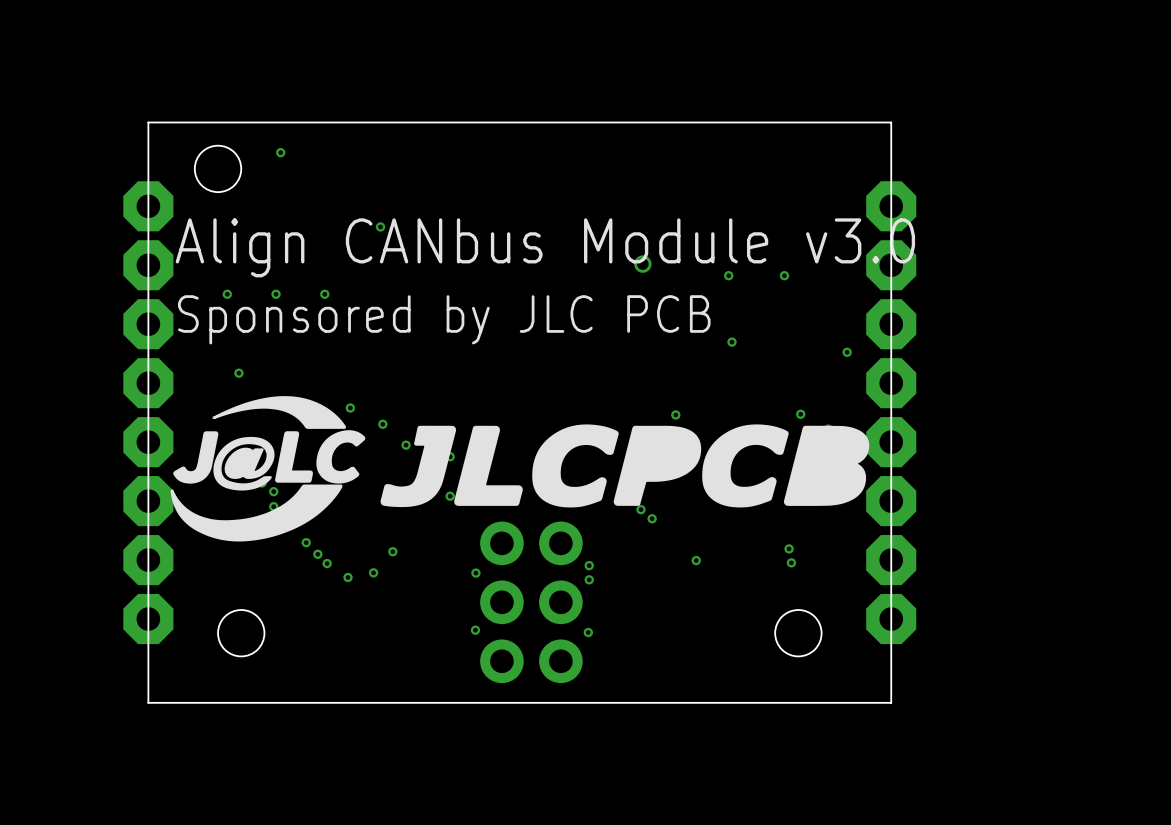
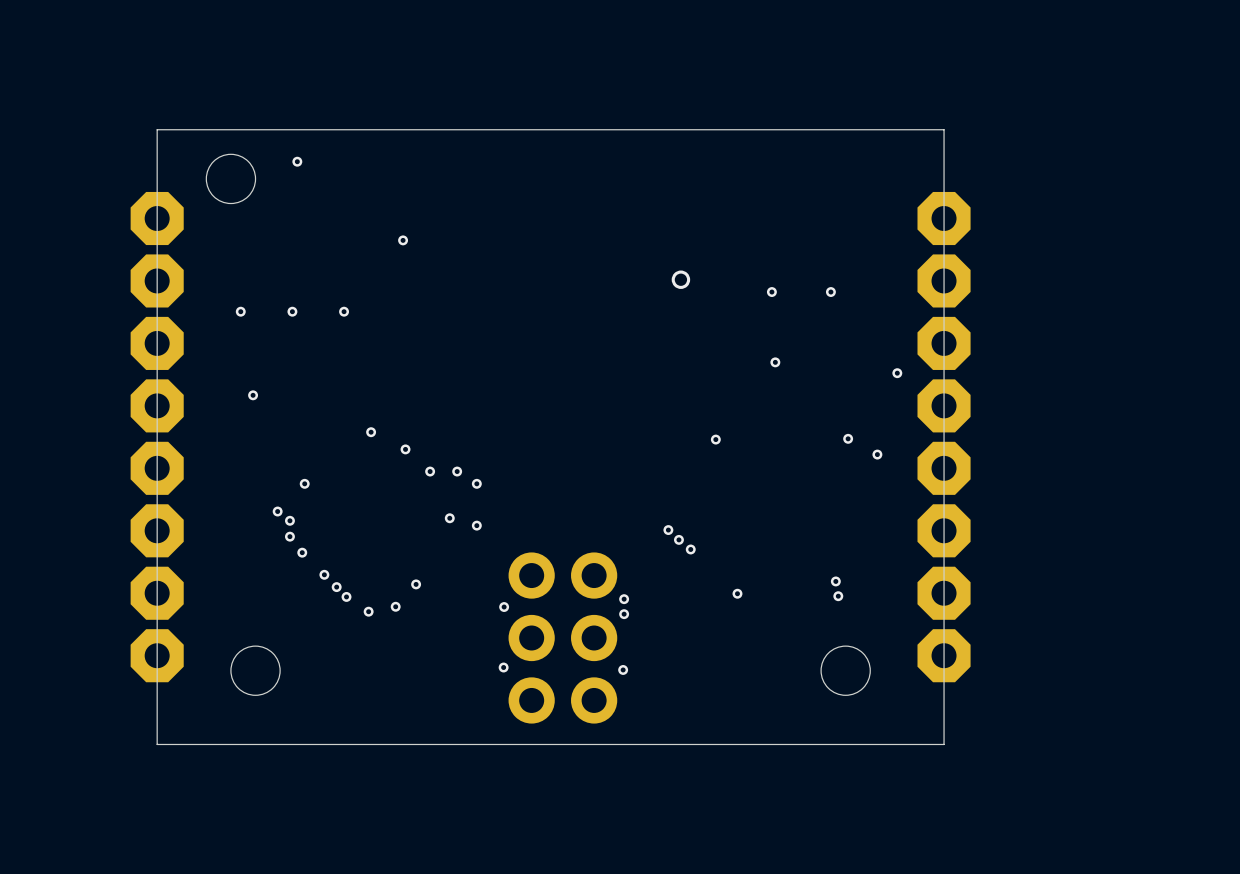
text: Align CANbus Module v3.0 (545, 247) -> none
text: Sponsored by JLC PCB (444, 319) -> none
drawing: [170, 396, 870, 542] -> none

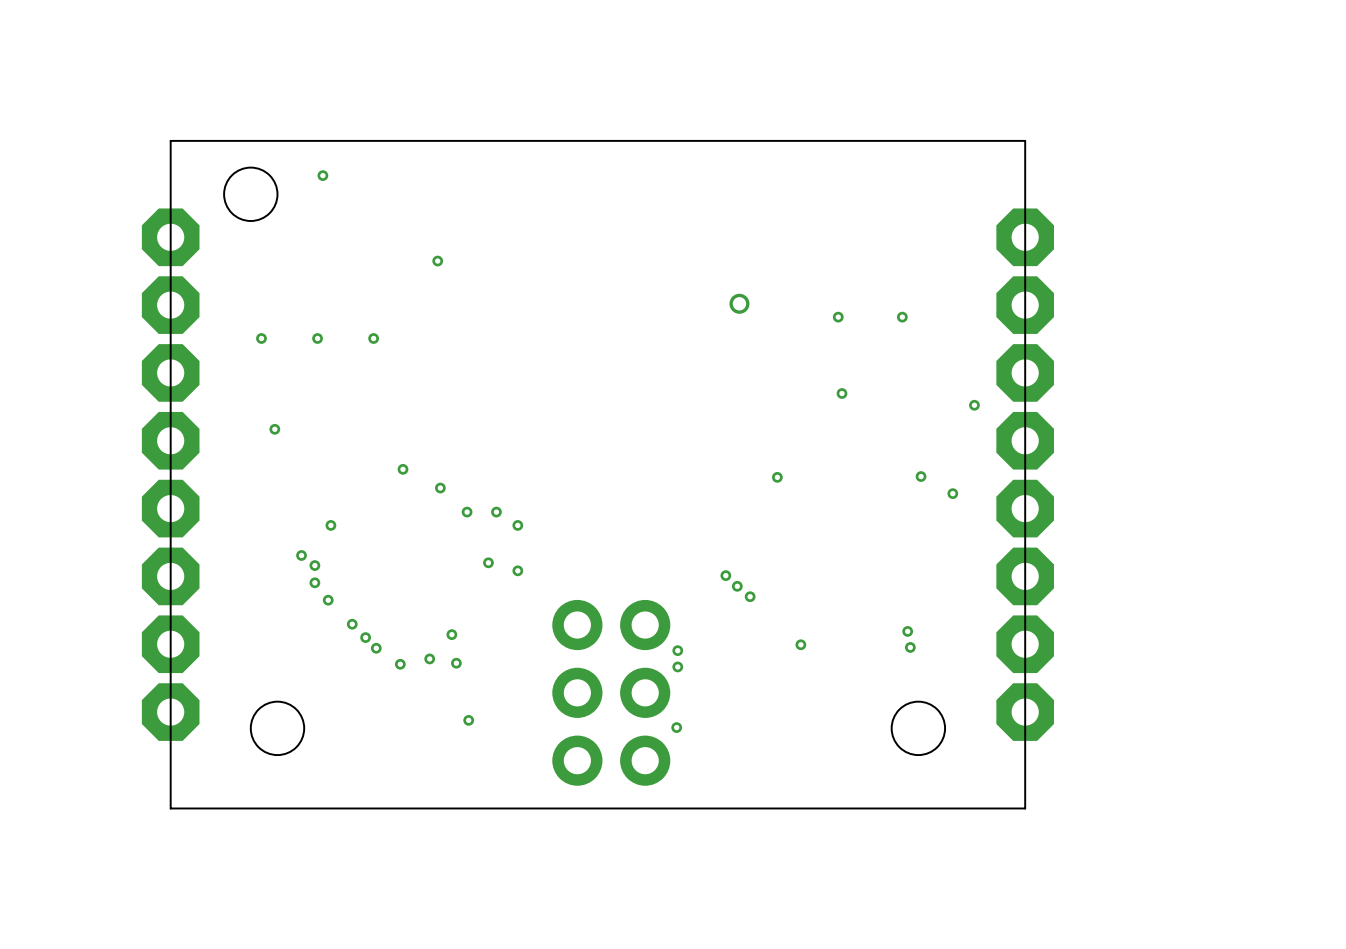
via: (504, 607) -> none
via: none -> (456, 663)
via: none -> (468, 720)
via: (503, 667) -> none

